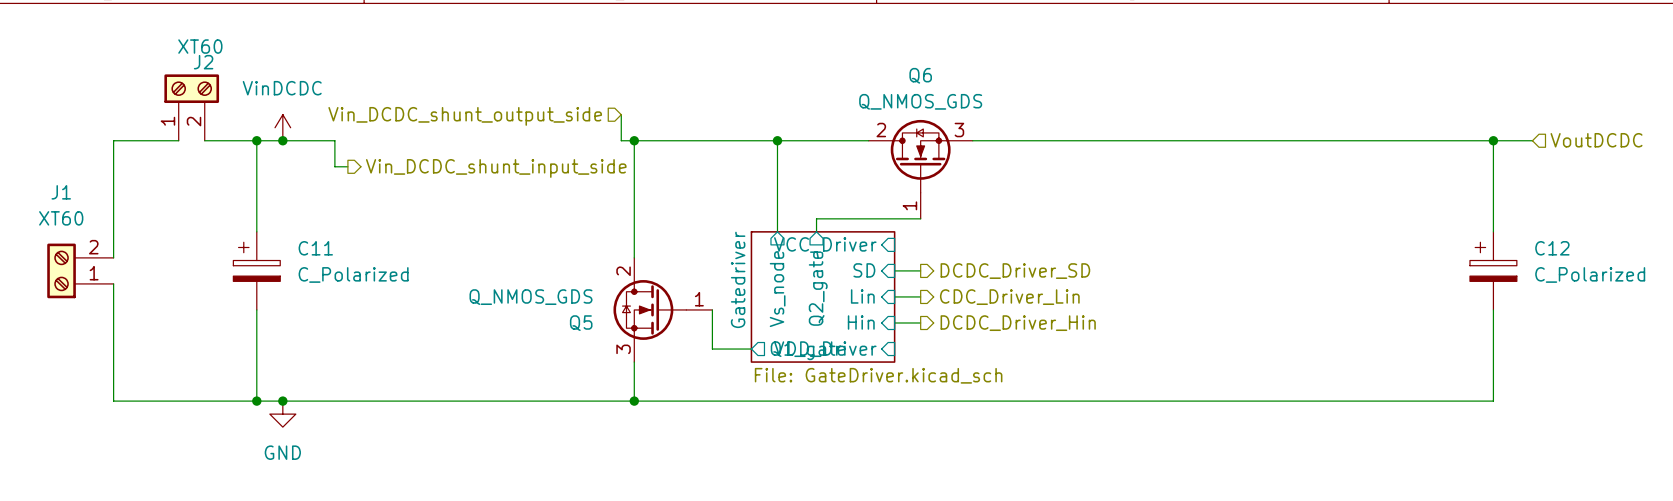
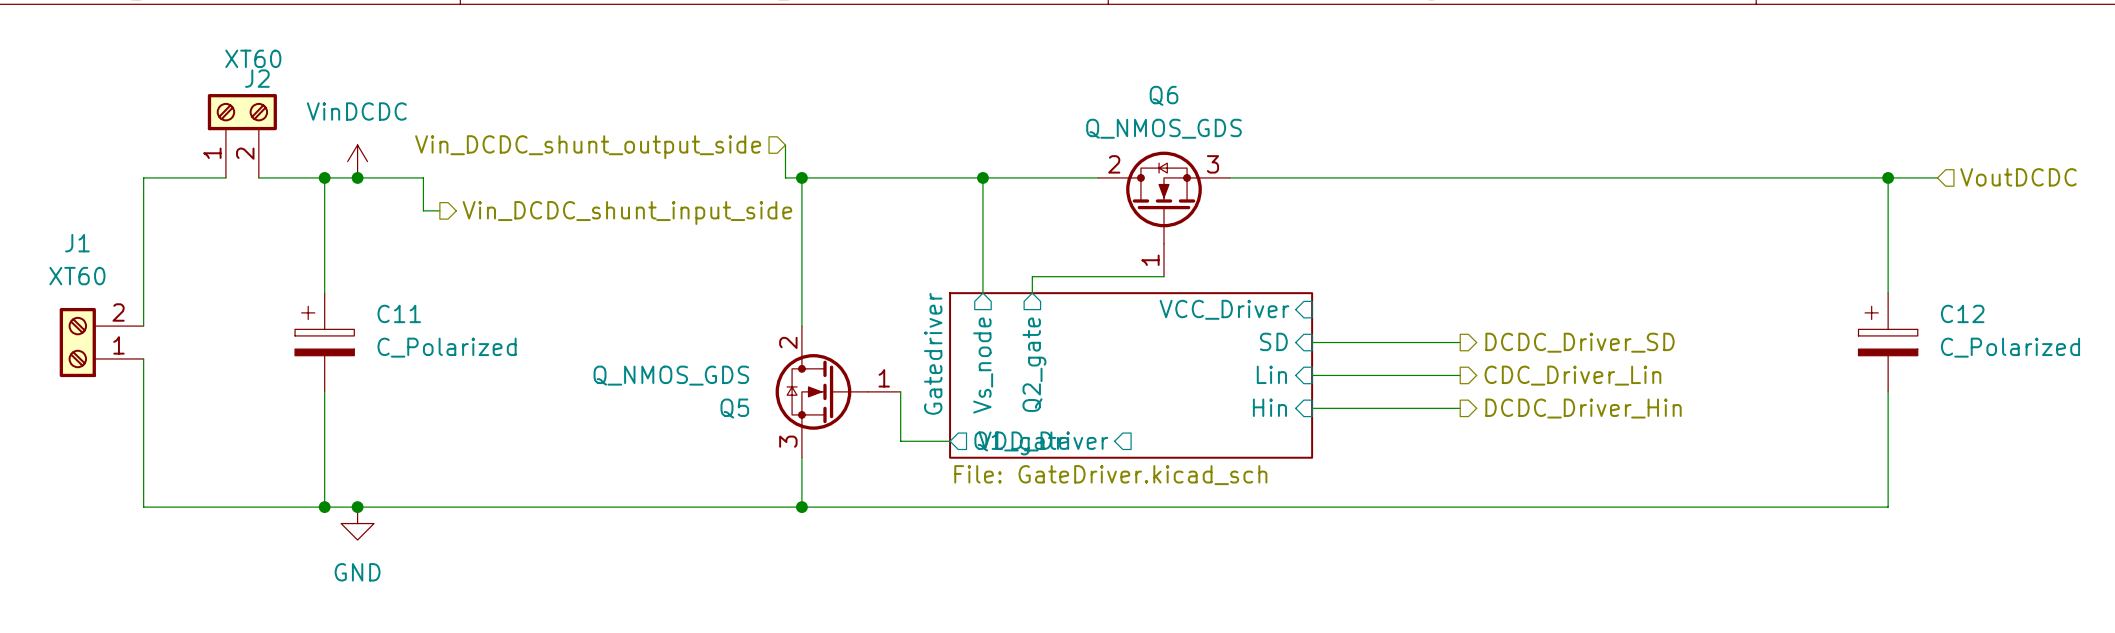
sheet pin position: VCC_Driver (825, 245) -> VCC_Driver (1224, 309)
sheet pin position: SD (864, 270) -> SD (1273, 341)
wire: (894, 270) (920, 270) -> none
wire: none -> (1312, 342) (1460, 342)
hierarchical label position: DCDC_Driver_SD (1015, 271) -> DCDC_Driver_SD (1580, 342)
sheet Gatedriver: File: GateDriver.kicad_sch (823, 296) -> none
sheet pin position: Lin (862, 296) -> Lin (1271, 374)
wire: (894, 296) (920, 296) -> none
sheet Gatedriver: none -> File: GateDriver.kicad_sch (1131, 375)
wire: none -> (1312, 375) (1460, 375)
hierarchical label position: CDC_Driver_Lin (1009, 297) -> CDC_Driver_Lin (1572, 375)
sheet pin position: Hin (861, 322) -> Hin (1269, 407)
wire: (894, 322) (920, 322) -> none
wire: none -> (1312, 408) (1460, 408)
hierarchical label position: DCDC_Driver_Hin (1018, 323) -> DCDC_Driver_Hin (1583, 408)

